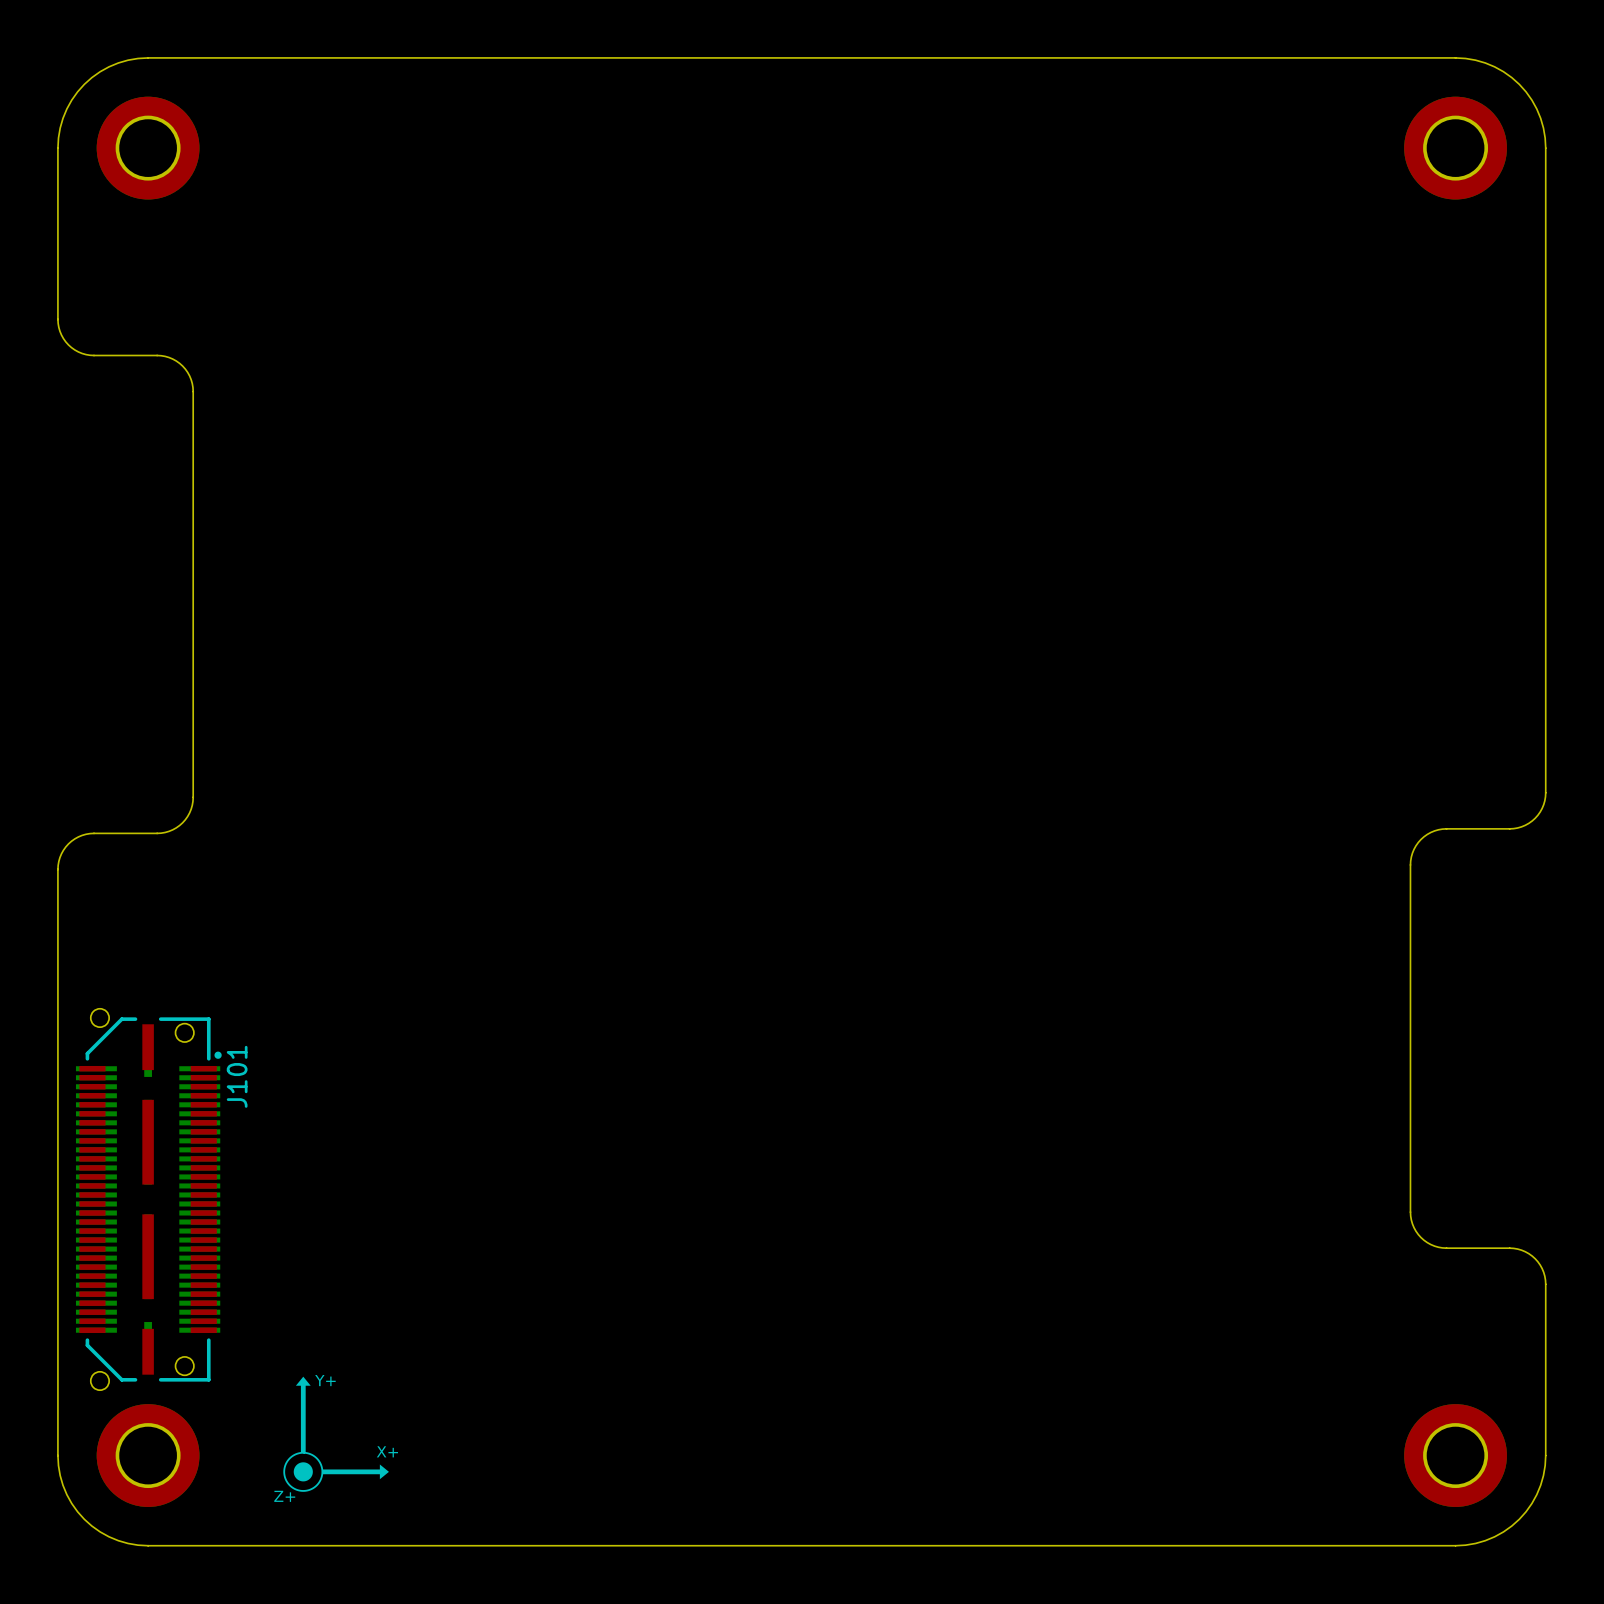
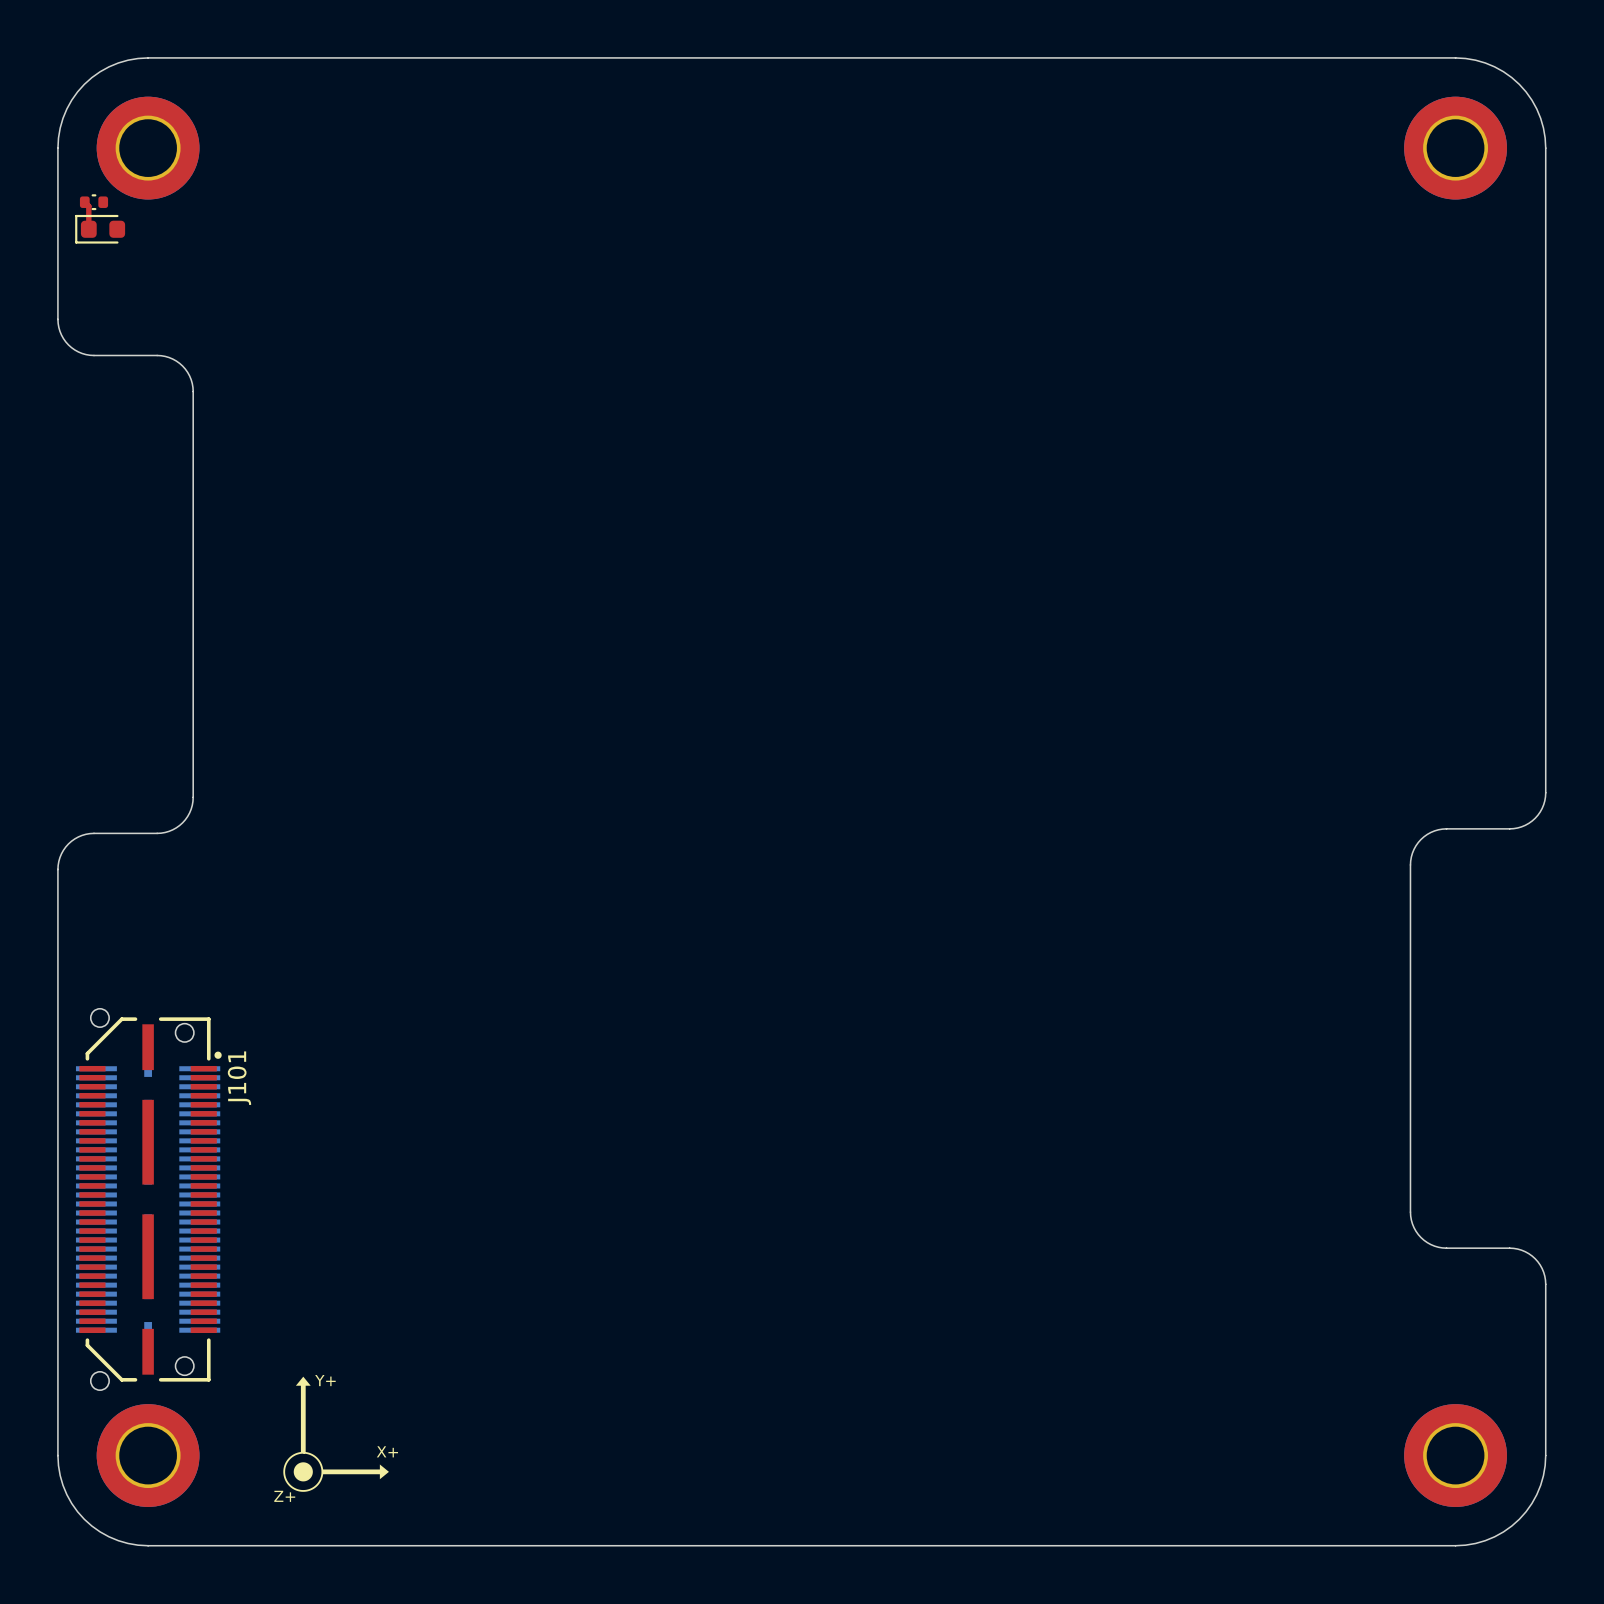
top track: none -> (84, 202) (88, 206) (88, 229)
part: none -> (94, 202)
part: none -> (100, 229)

